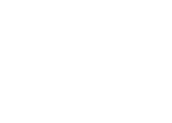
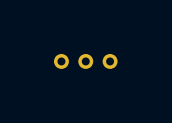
part: none -> (85, 61)

